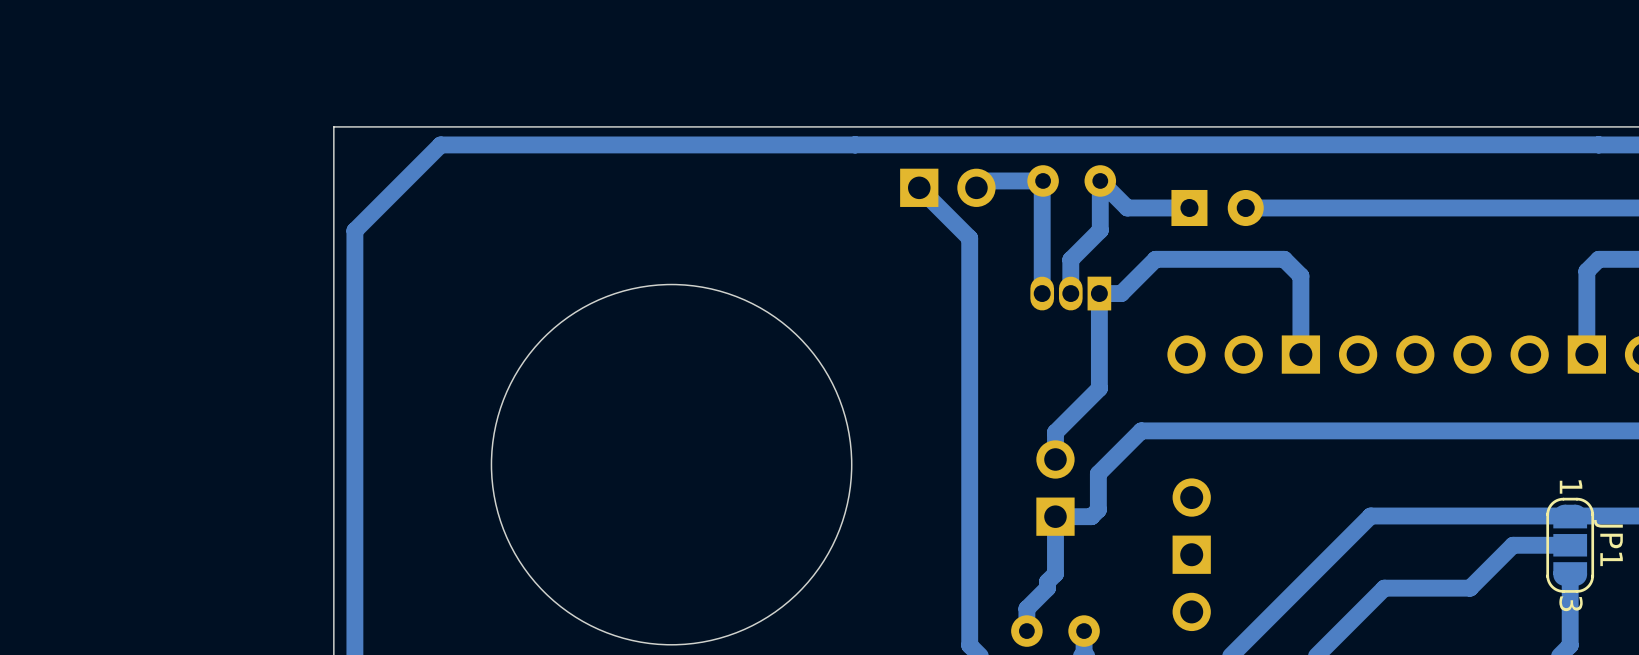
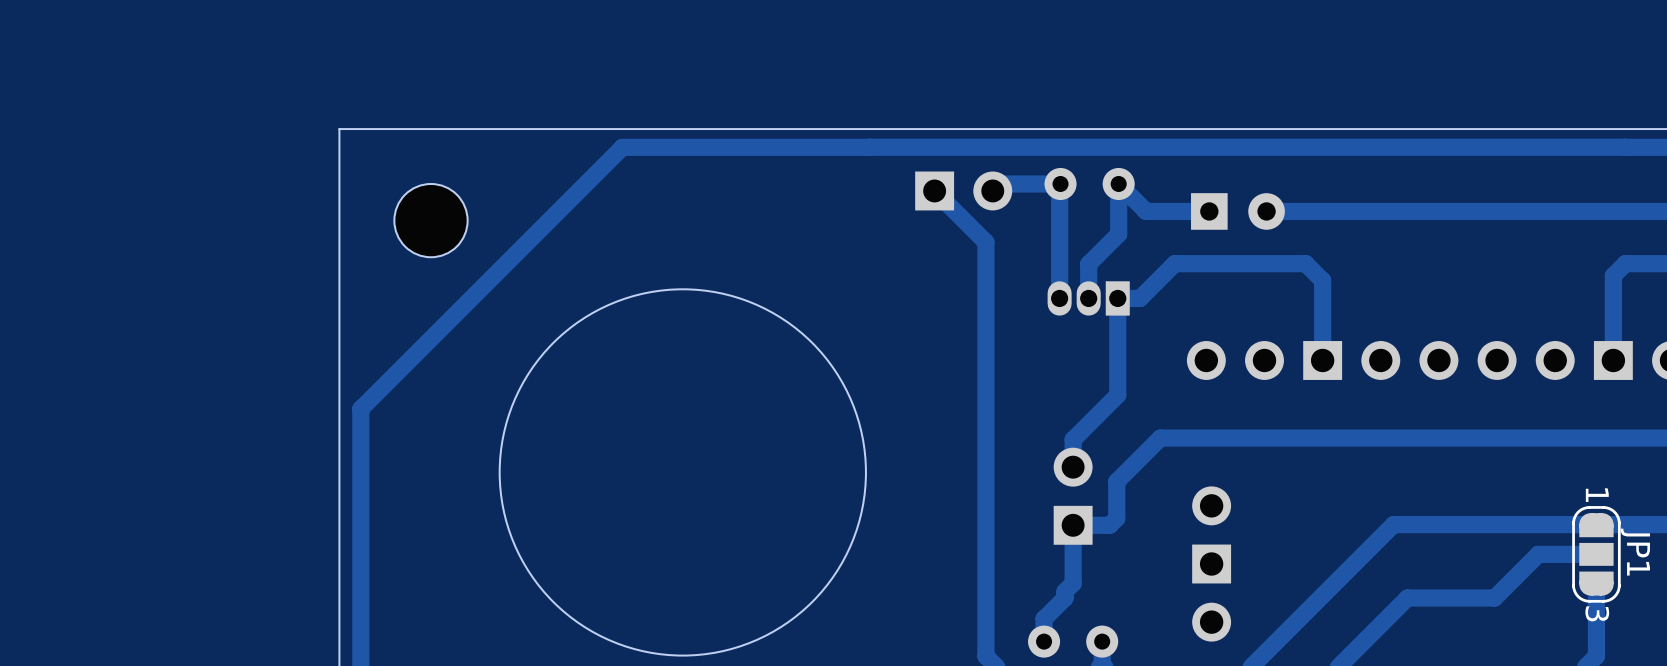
track: (612, 144) (440, 144) (354, 230) (354, 402) -> (622, 147) (360, 409)
part: none -> (430, 220)

